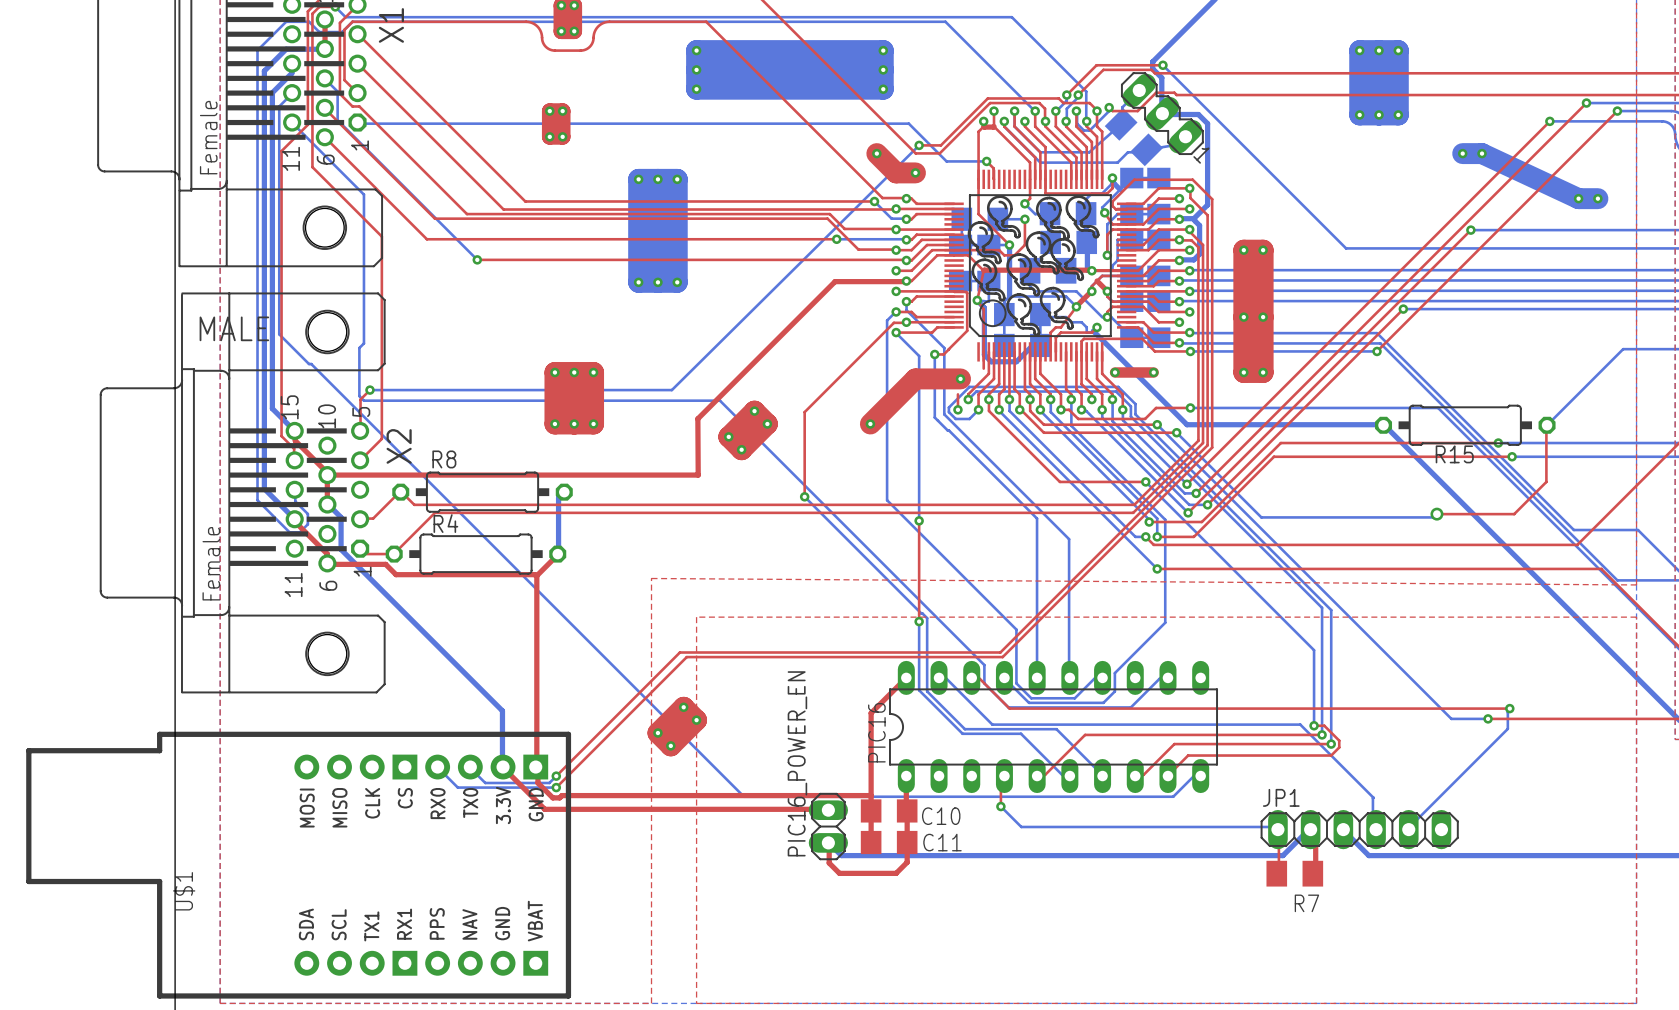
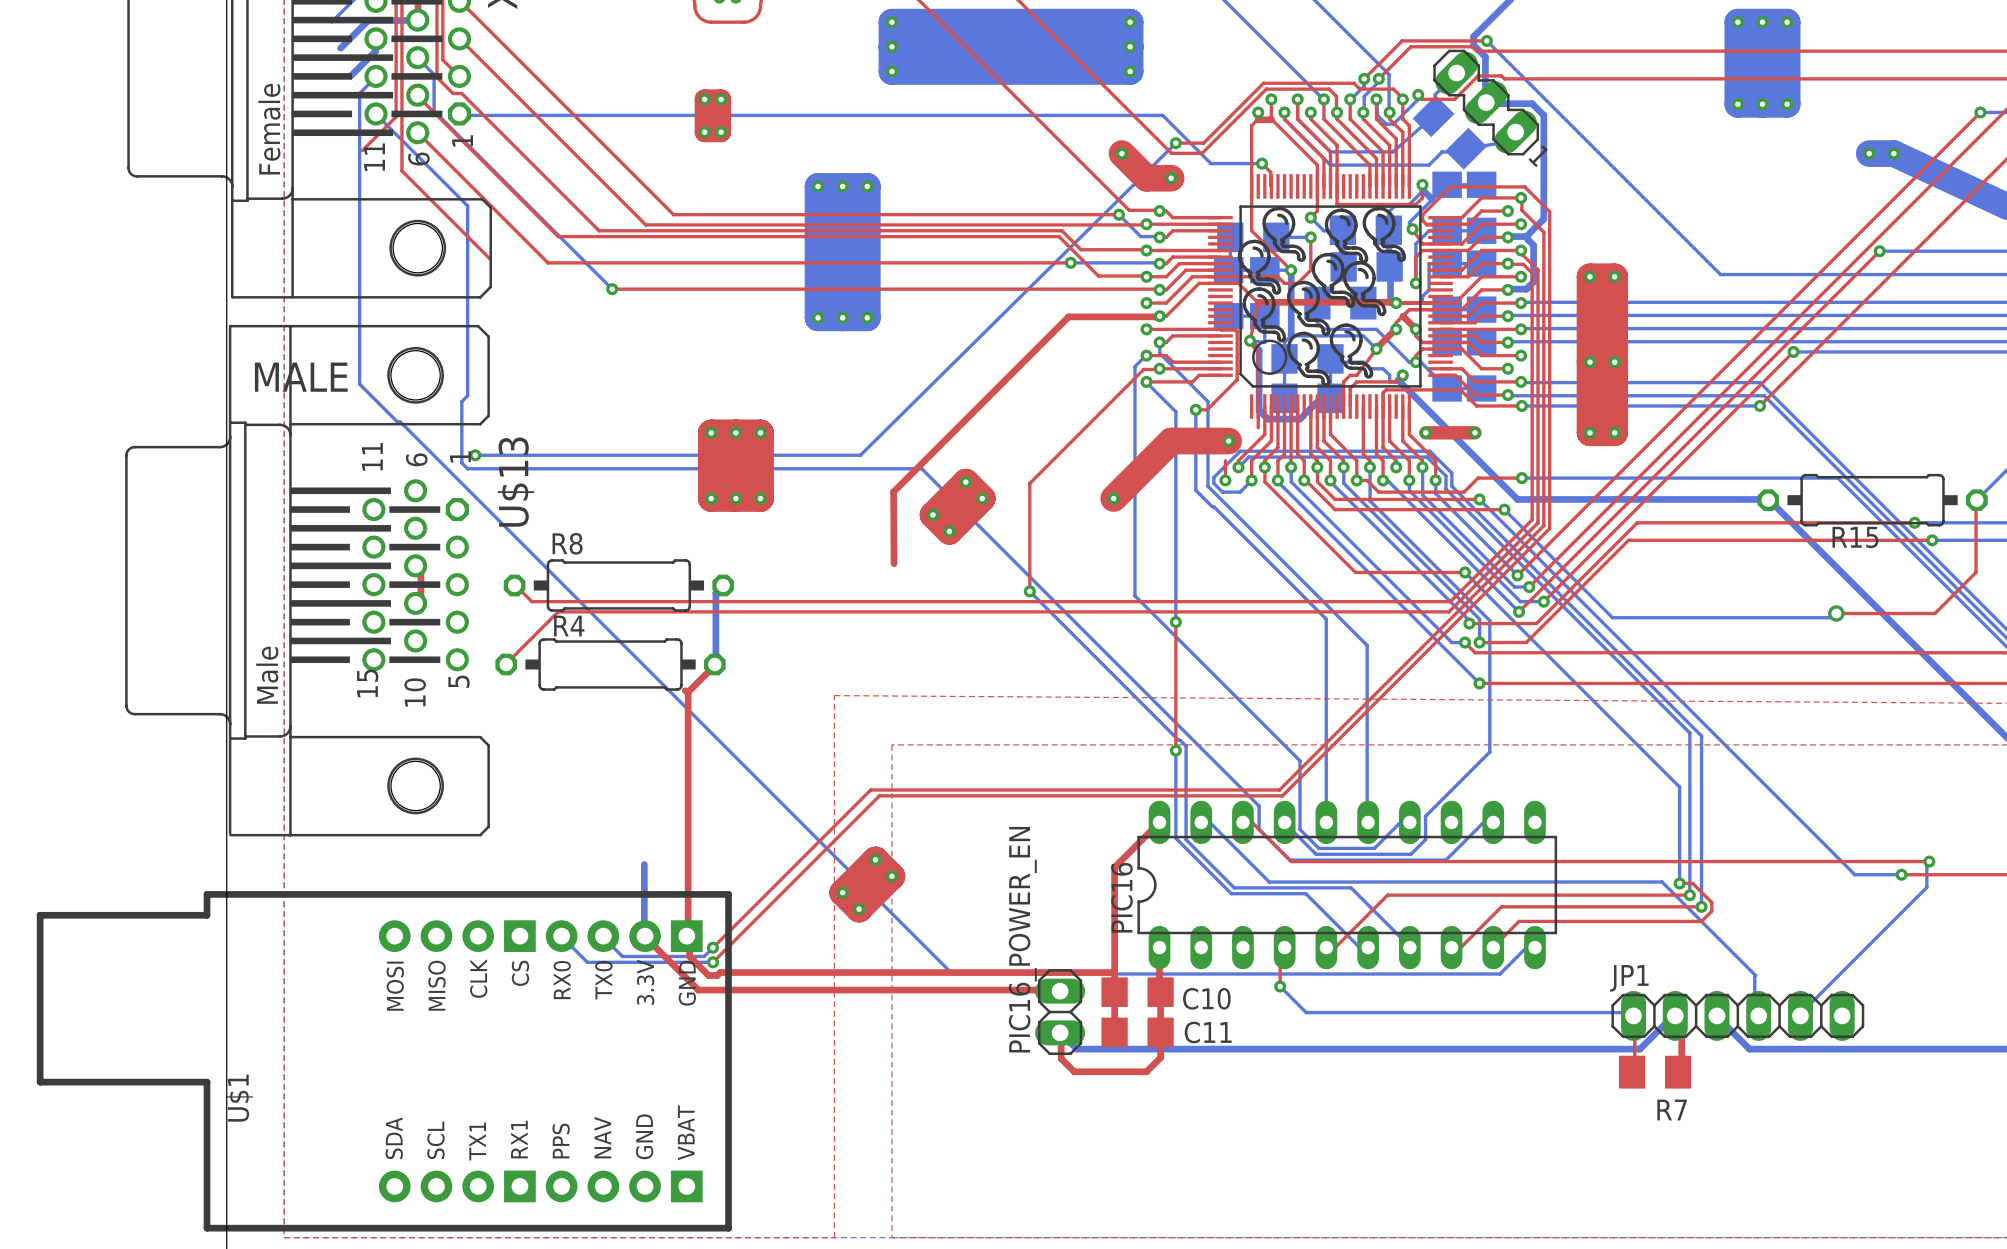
bottom track: (257, 50) (257, 500) (289, 532) (299, 532) (307, 524) (307, 513) (295, 501) (294, 489) -> none
bottom track: (264, 71) (264, 488) (294, 519) -> none
bottom track: (272, 92) (272, 408) (294, 430) -> none
top track: (281, 151) (281, 436) (294, 448) (294, 460) -> none
top track: (381, 236) (381, 438) (360, 460) -> none
top track: (369, 390) (360, 399) (360, 430) -> none
top track: (294, 430) (295, 440) (327, 472) (327, 475) (698, 475) -> none
U$13: none -> (307, 580)
X2: (242, 492) -> none
top track: (399, 492) (373, 518) (360, 519) -> none
bottom track: (327, 504) (341, 517) (341, 549) (502, 710) -> none
top track: (294, 519) (327, 554) (327, 563) -> none
top track: (360, 548) (365, 554) (393, 554) -> none
top track: (327, 563) (385, 564) (396, 574) (534, 574) -> none

